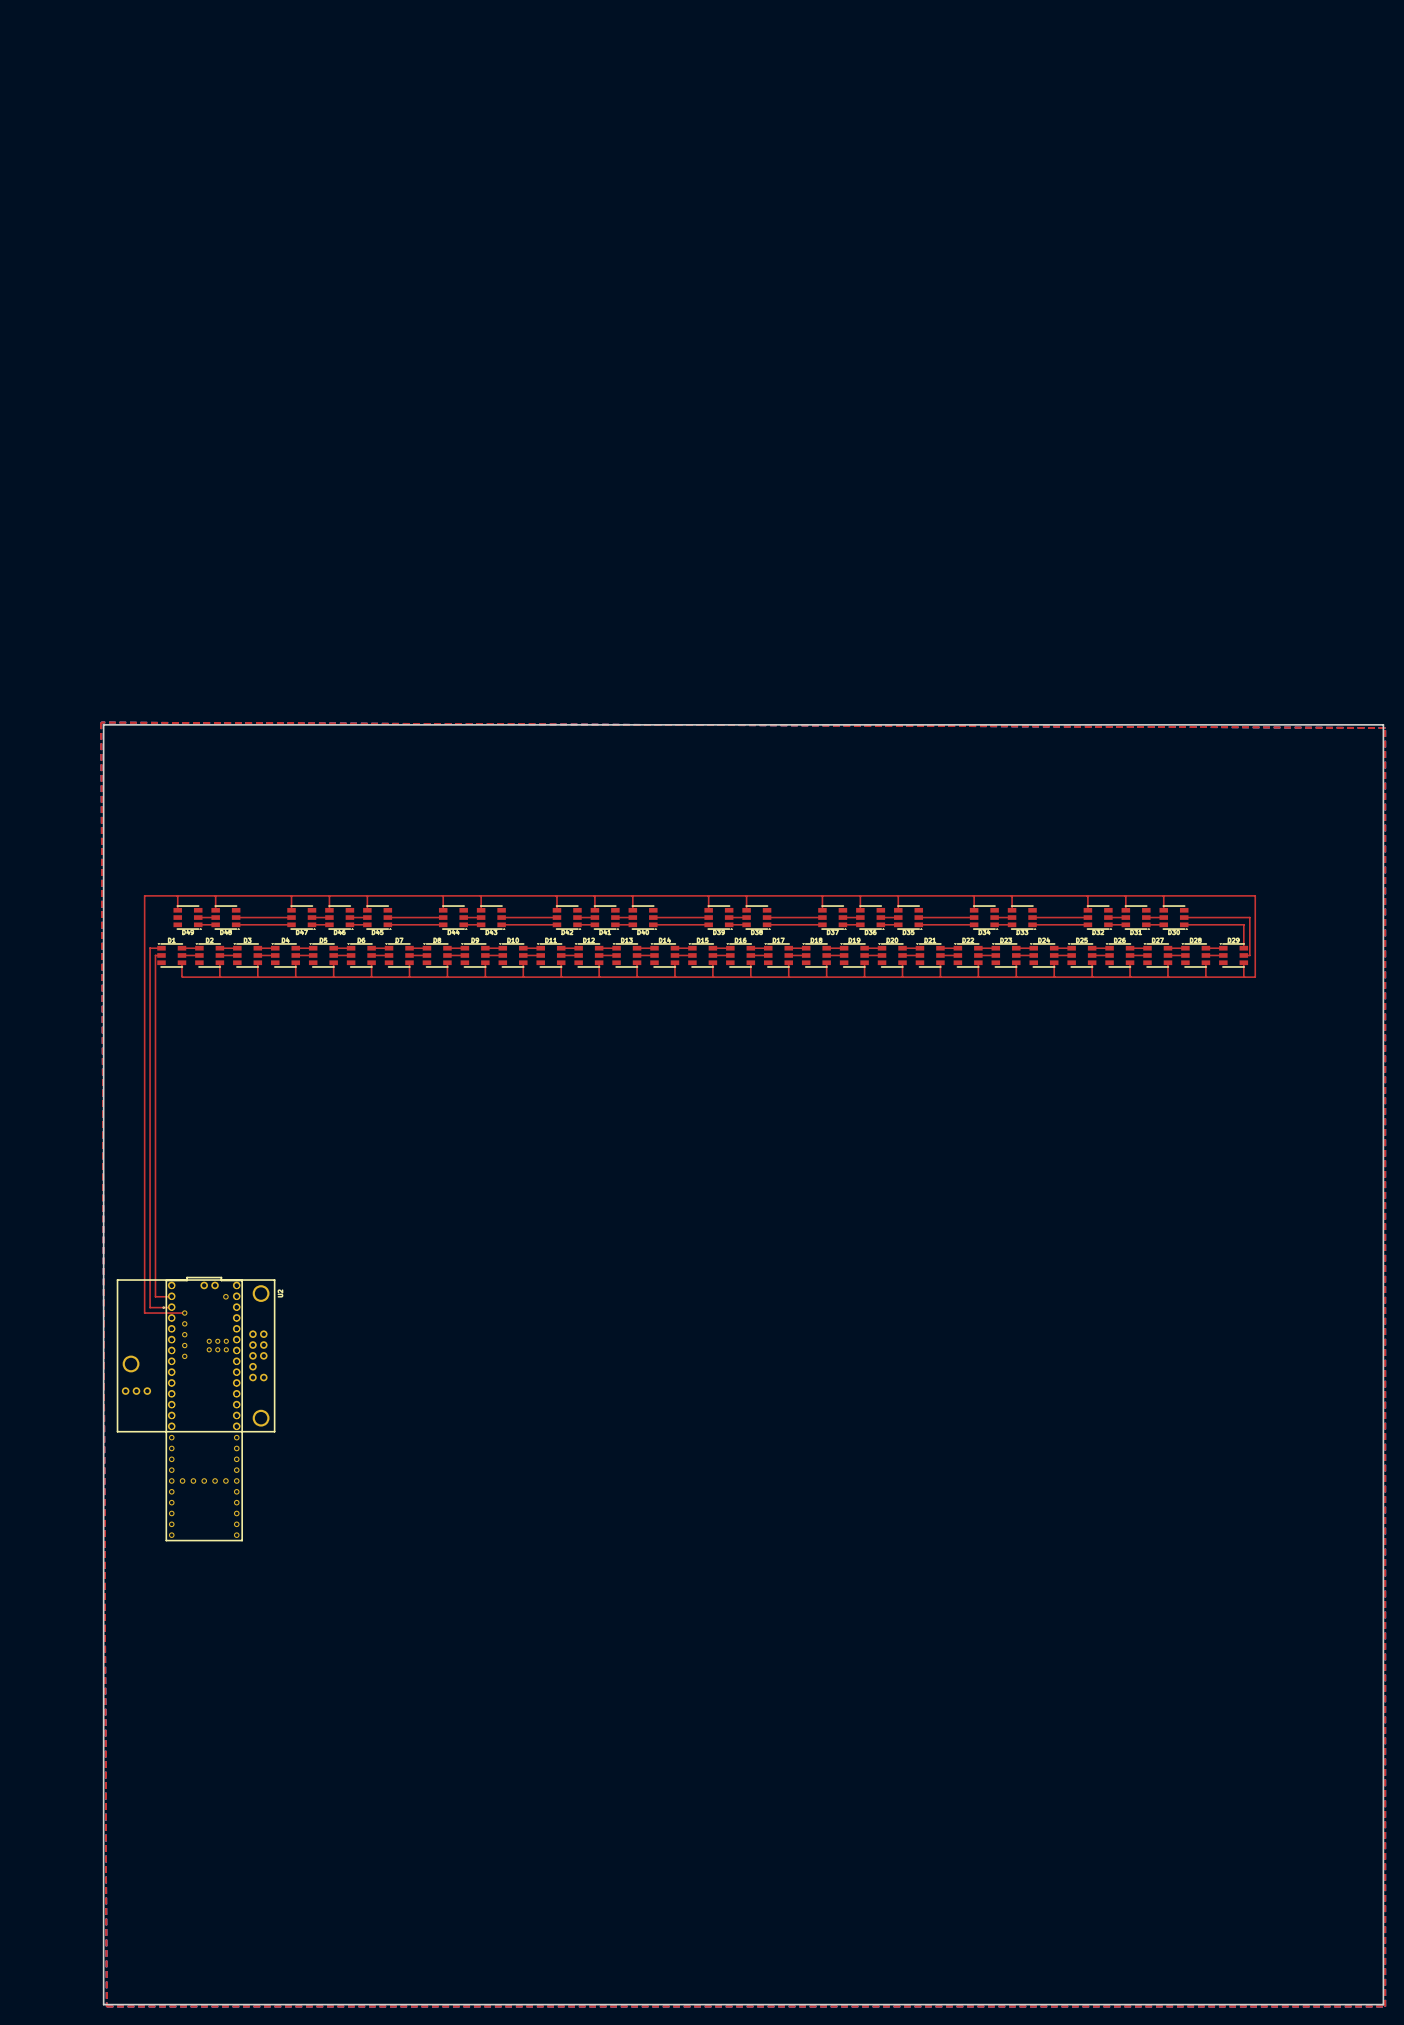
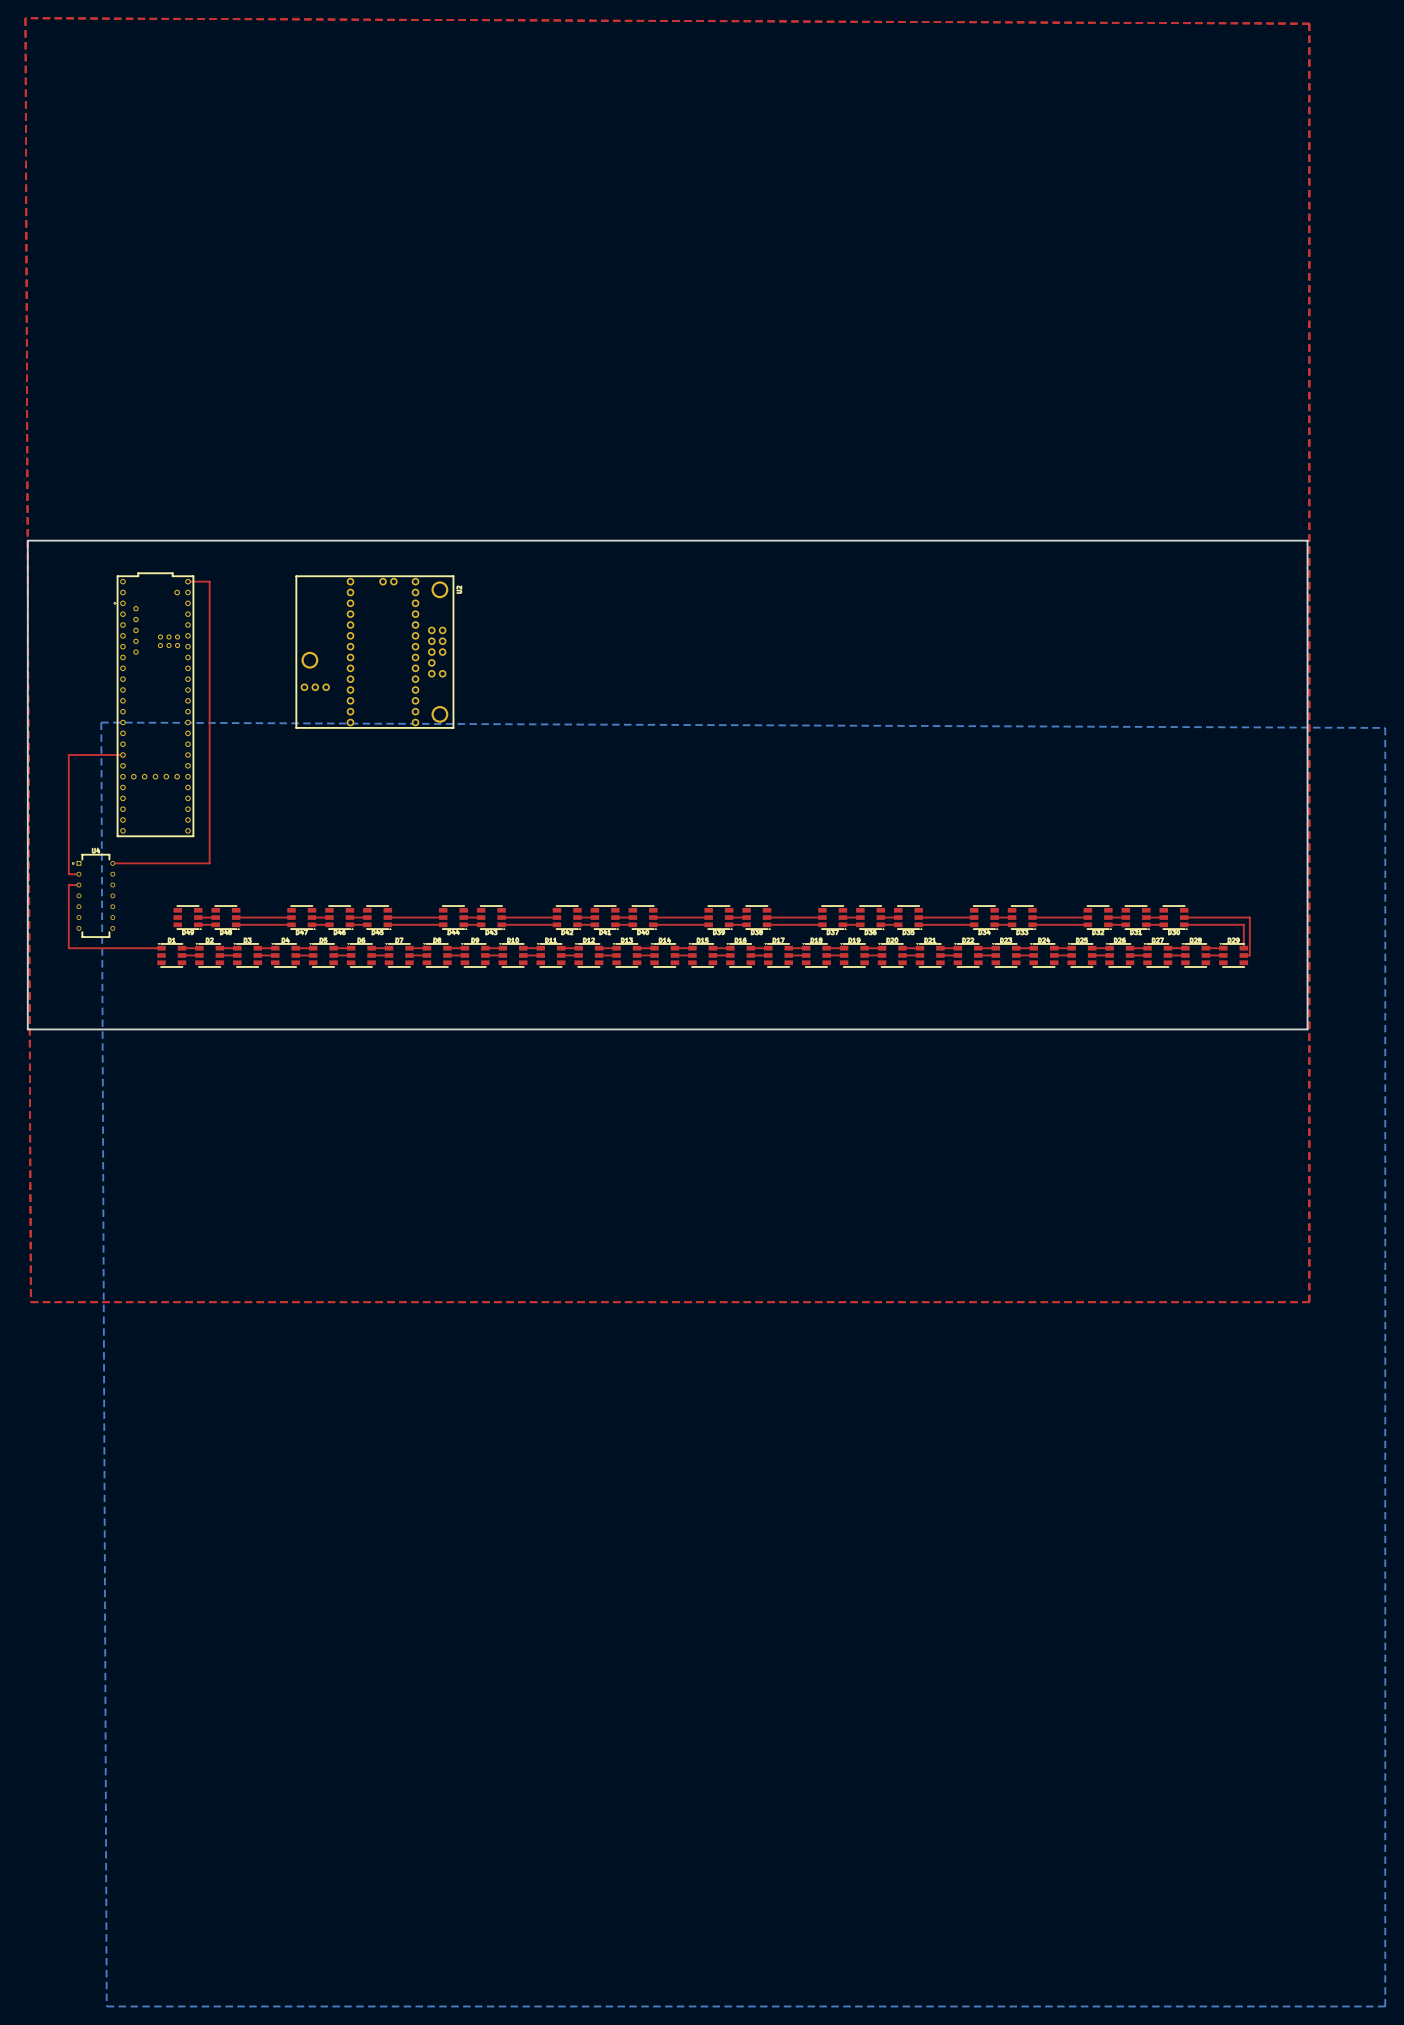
top zone outline: none -> (25, 18) (30, 1302) (1309, 1302) (1309, 23) (25, 18)
board edge: none -> (27, 540) (1307, 540) (1307, 1029) (27, 1029) (27, 540)
top track: none -> (187, 581) (209, 581) (209, 863) (112, 863)
part: none -> (153, 704)
top zone outline: (101, 722) (106, 2006) (1385, 2006) (1385, 727) (101, 722) -> none
board edge: (103, 724) (1383, 724) (1383, 2004) (103, 2004) (103, 724) -> none
top track: none -> (122, 755) (68, 755) (68, 874) (78, 874)
part: none -> (93, 895)
top track: (177, 895) (177, 910) -> none
top track: (215, 895) (215, 910) -> none
top track: (290, 895) (291, 910) -> none
top track: (328, 895) (329, 910) -> none
top track: (366, 895) (367, 910) -> none
top track: (442, 895) (443, 910) -> none
top track: (480, 895) (481, 910) -> none
top track: (556, 895) (556, 910) -> none
top track: (594, 895) (594, 910) -> none
top track: (632, 895) (632, 910) -> none
top track: (708, 895) (708, 910) -> none
top track: (746, 895) (746, 910) -> none
top track: (821, 895) (822, 910) -> none
top track: (859, 895) (860, 910) -> none
top track: (897, 895) (898, 910) -> none
top track: (973, 895) (974, 910) -> none
top track: (1011, 895) (1012, 910) -> none
top track: (1087, 895) (1087, 910) -> none
top track: (1125, 895) (1125, 910) -> none
top track: (1163, 895) (1163, 910) -> none
top track: (150, 948) (150, 1307) (171, 1307) -> (150, 948) (68, 948) (68, 885) (78, 885)
top track: (161, 955) (155, 955) (155, 1296) (171, 1296) -> none
top track: (181, 962) (182, 977) (1255, 977) (1255, 895) (144, 895) (144, 1313) (184, 1313) -> none
top track: (219, 962) (220, 977) -> none
top track: (257, 962) (258, 977) -> none
top track: (295, 962) (296, 977) -> none
top track: (333, 962) (334, 977) -> none
top track: (371, 962) (372, 977) -> none
top track: (409, 962) (410, 977) -> none
top track: (447, 962) (448, 977) -> none
top track: (485, 962) (485, 977) -> none
top track: (523, 962) (523, 977) -> none
top track: (561, 962) (561, 977) -> none
top track: (599, 962) (599, 977) -> none
top track: (637, 962) (637, 977) -> none
top track: (674, 962) (675, 977) -> none
top track: (712, 962) (713, 977) -> none
top track: (750, 962) (751, 977) -> none
top track: (788, 962) (789, 977) -> none
top track: (826, 962) (827, 977) -> none
top track: (864, 962) (865, 977) -> none
top track: (902, 962) (903, 977) -> none
top track: (940, 962) (941, 977) -> none
top track: (978, 962) (978, 977) -> none
top track: (1016, 962) (1016, 977) -> none
top track: (1054, 962) (1054, 977) -> none
top track: (1092, 962) (1092, 977) -> none
top track: (1130, 962) (1130, 977) -> none
top track: (1167, 962) (1168, 977) -> none
top track: (1205, 962) (1206, 977) -> none
top track: (1243, 962) (1244, 977) -> none
part position: (196, 1355) -> (374, 652)
part: (202, 1409) -> none

